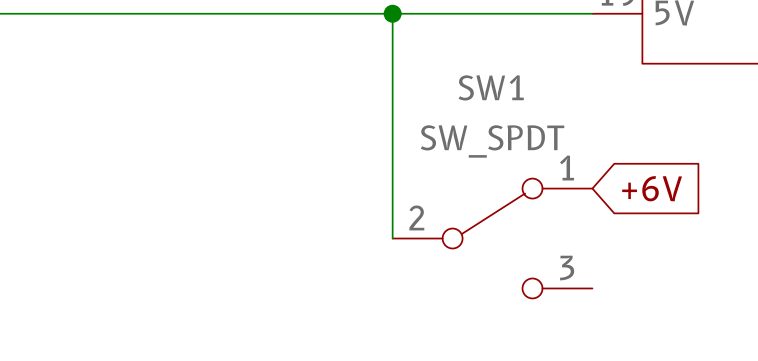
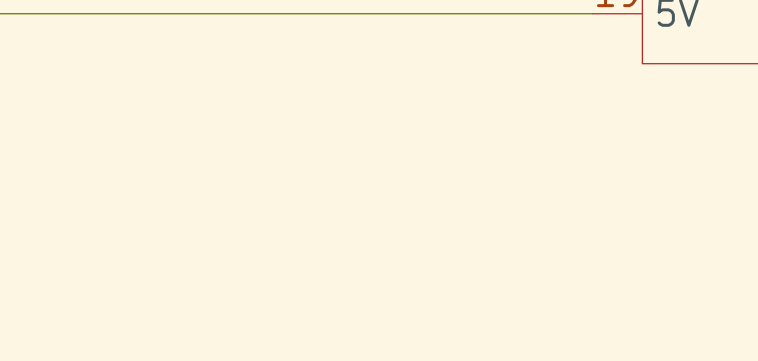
wire: (392, 13) (392, 238) -> none
junction: (392, 13) -> none
global label: +6V (652, 188) -> none
SW1: SW_SPDT (492, 238) -> none

